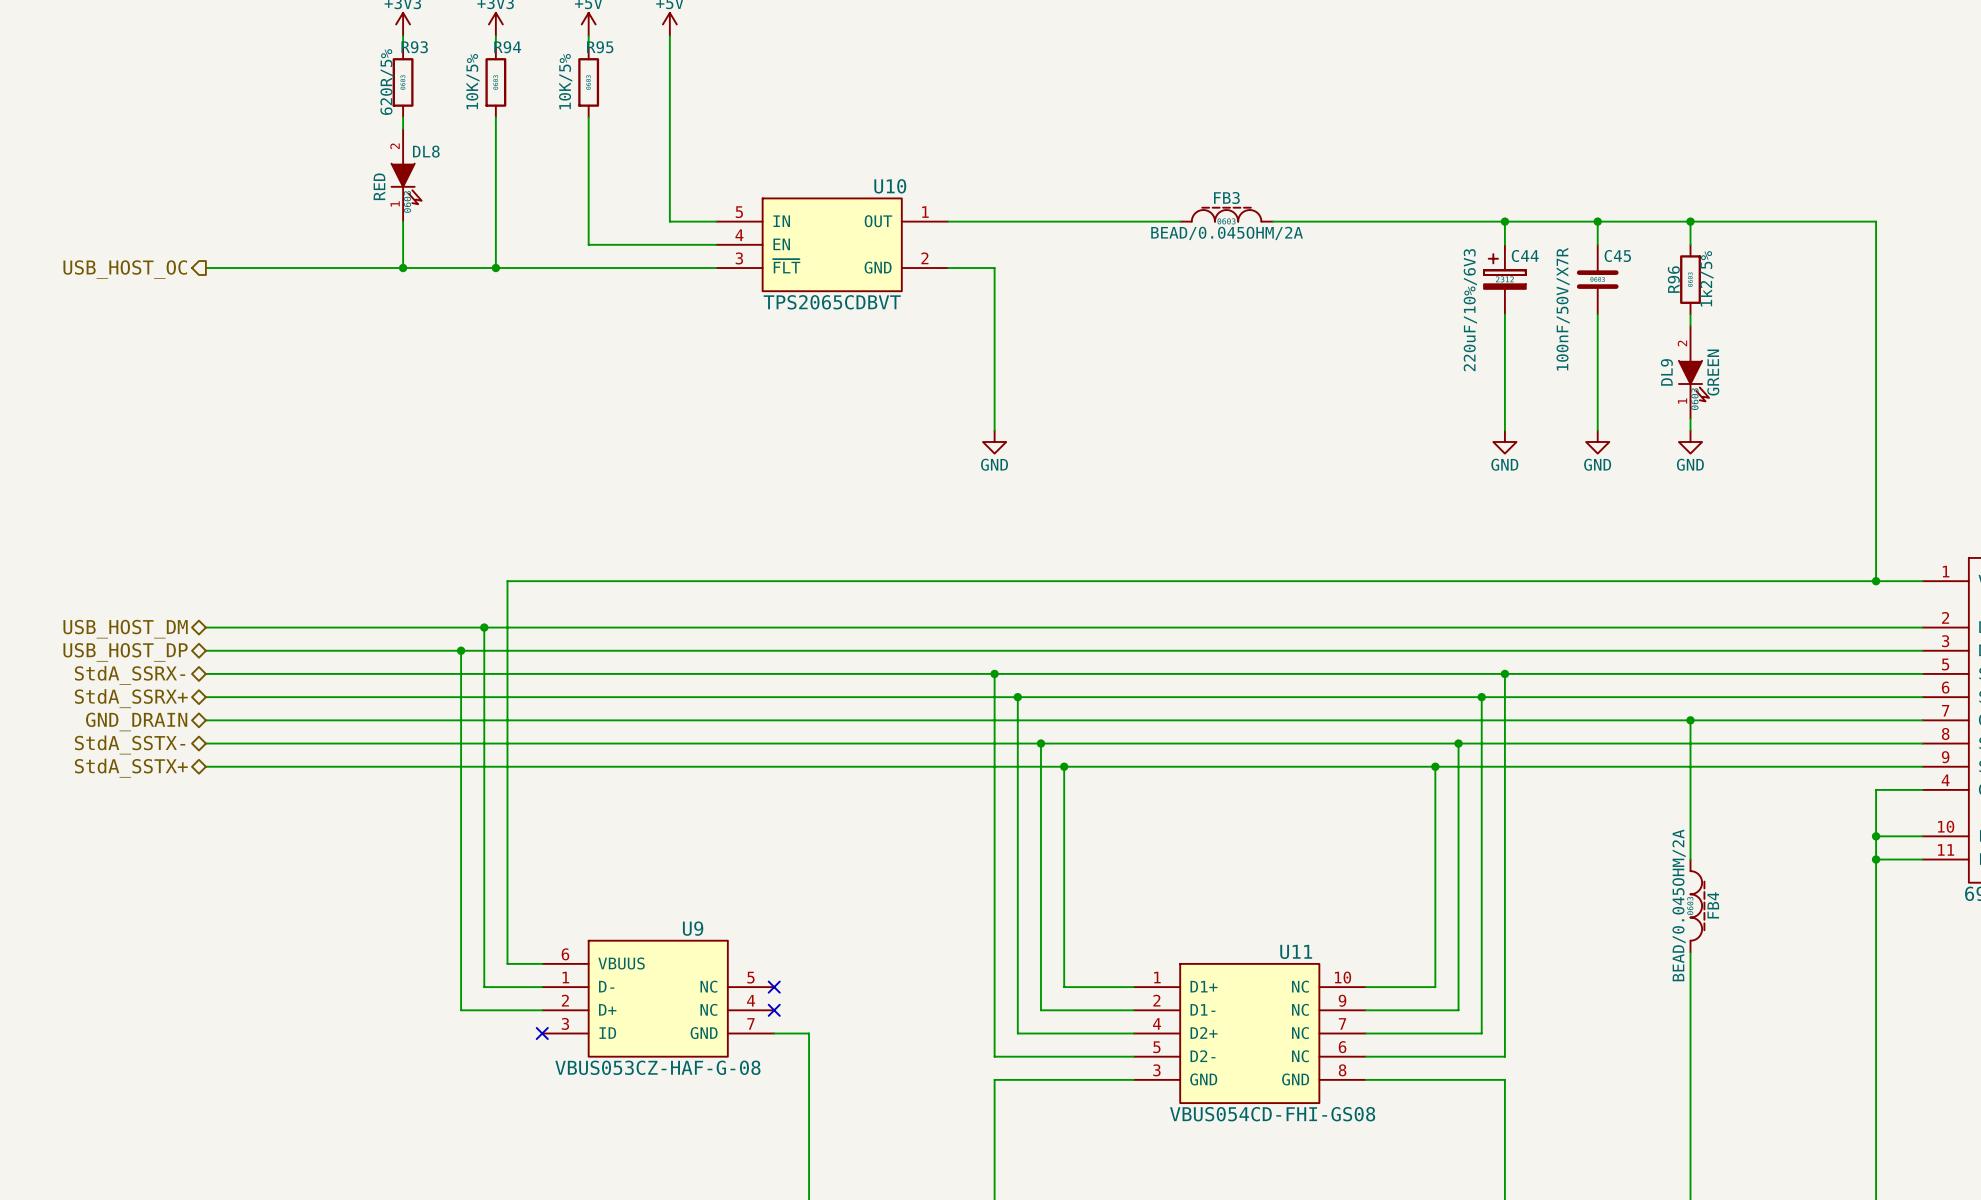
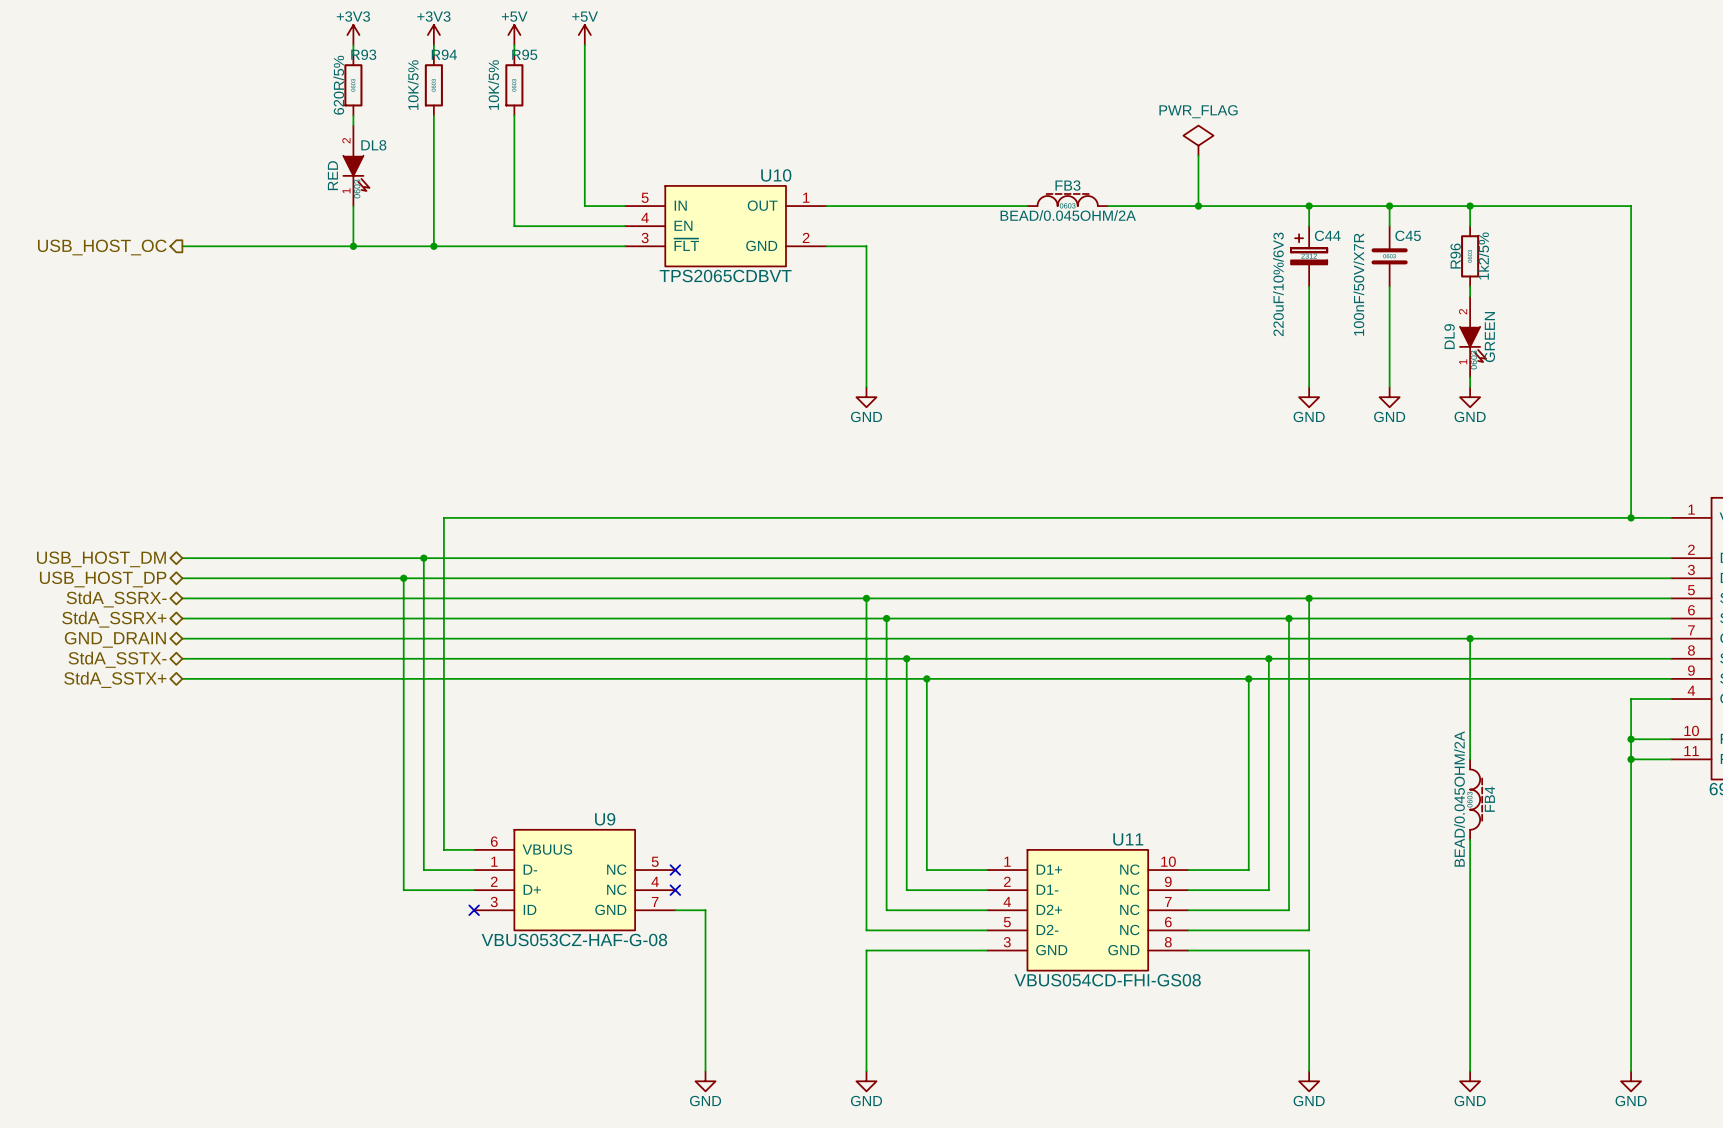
power symbol: none -> PWR_FLAG (1198, 140)
wire: none -> (1198, 155) (1198, 206)
junction: none -> (1198, 206)

